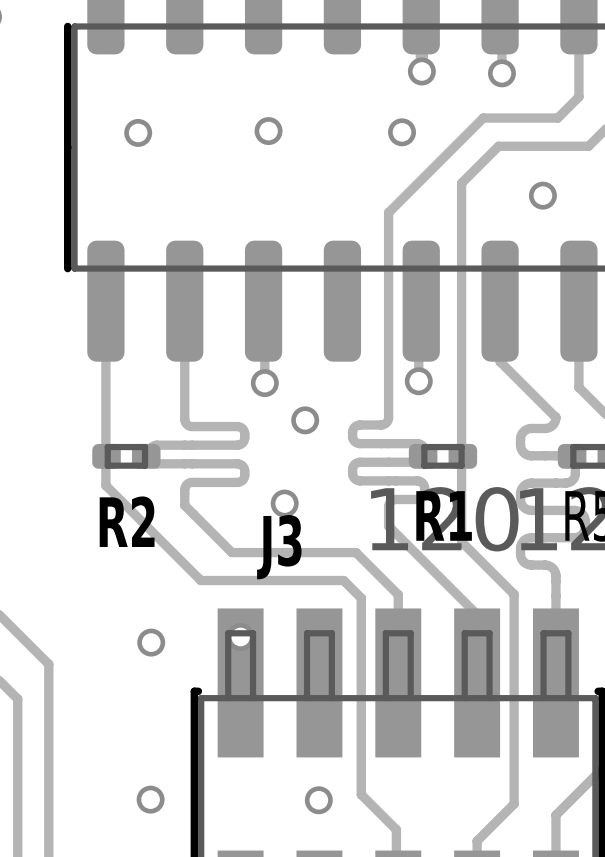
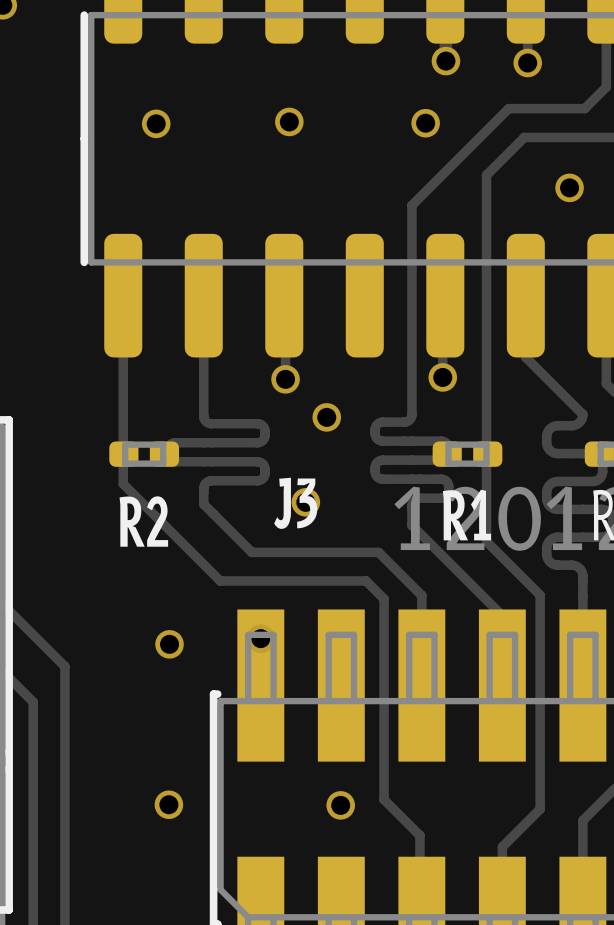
J3 name position: J3 (279, 547) -> J3 (295, 503)

